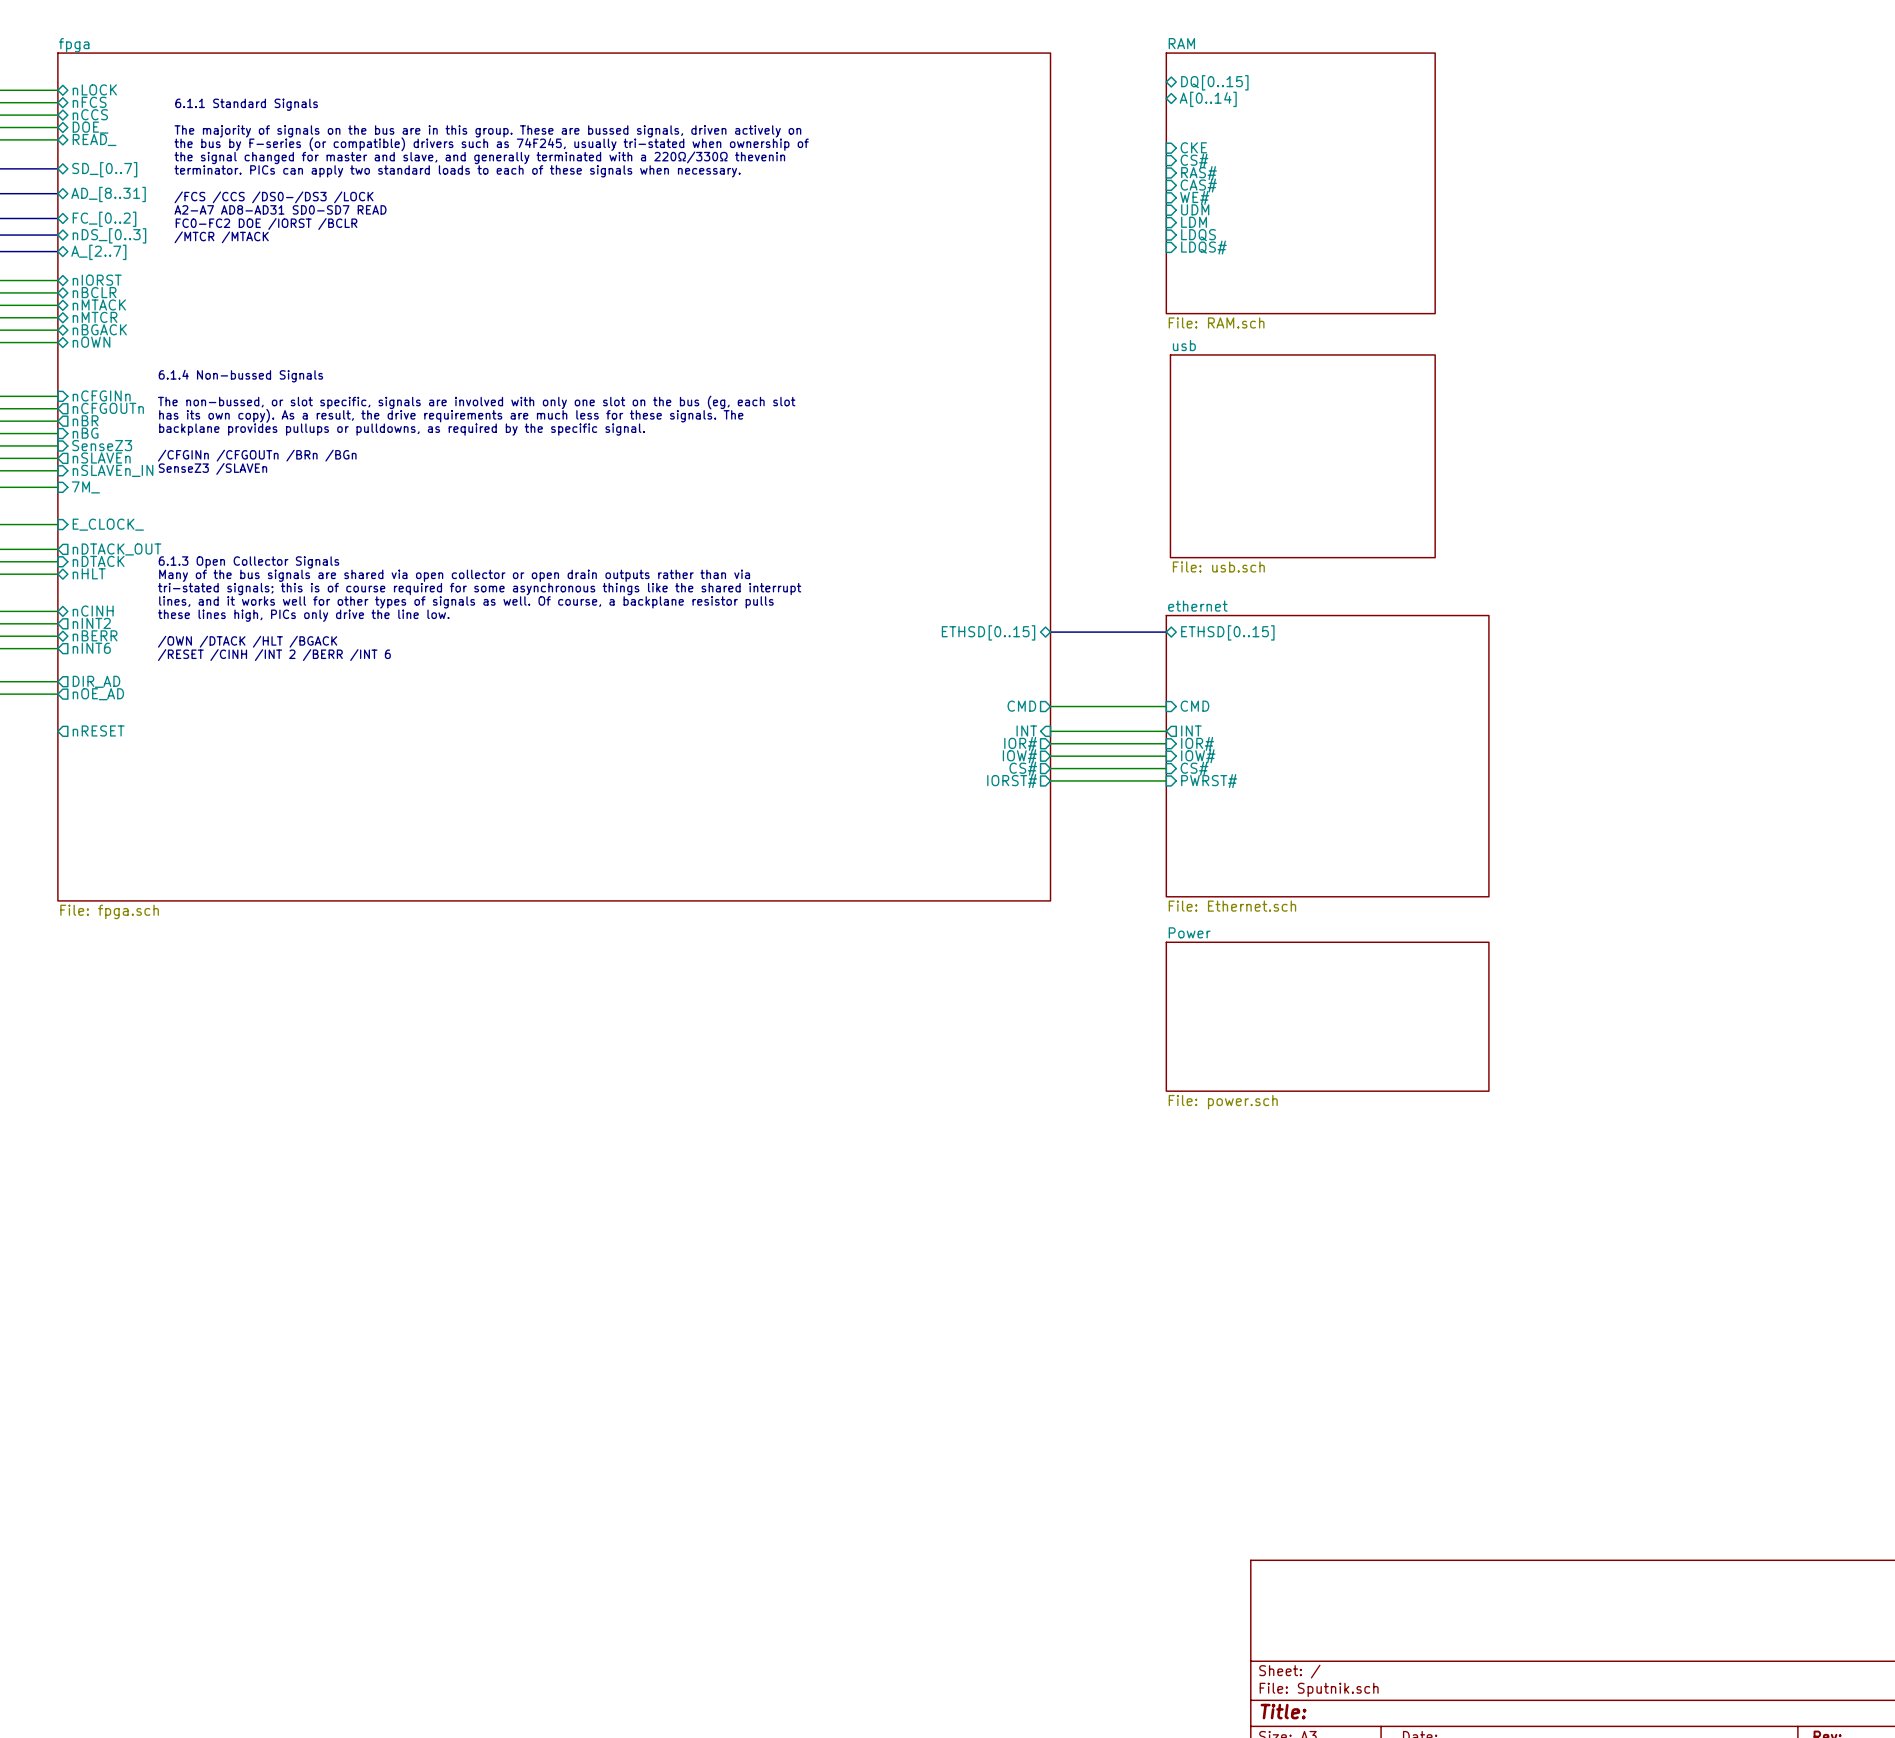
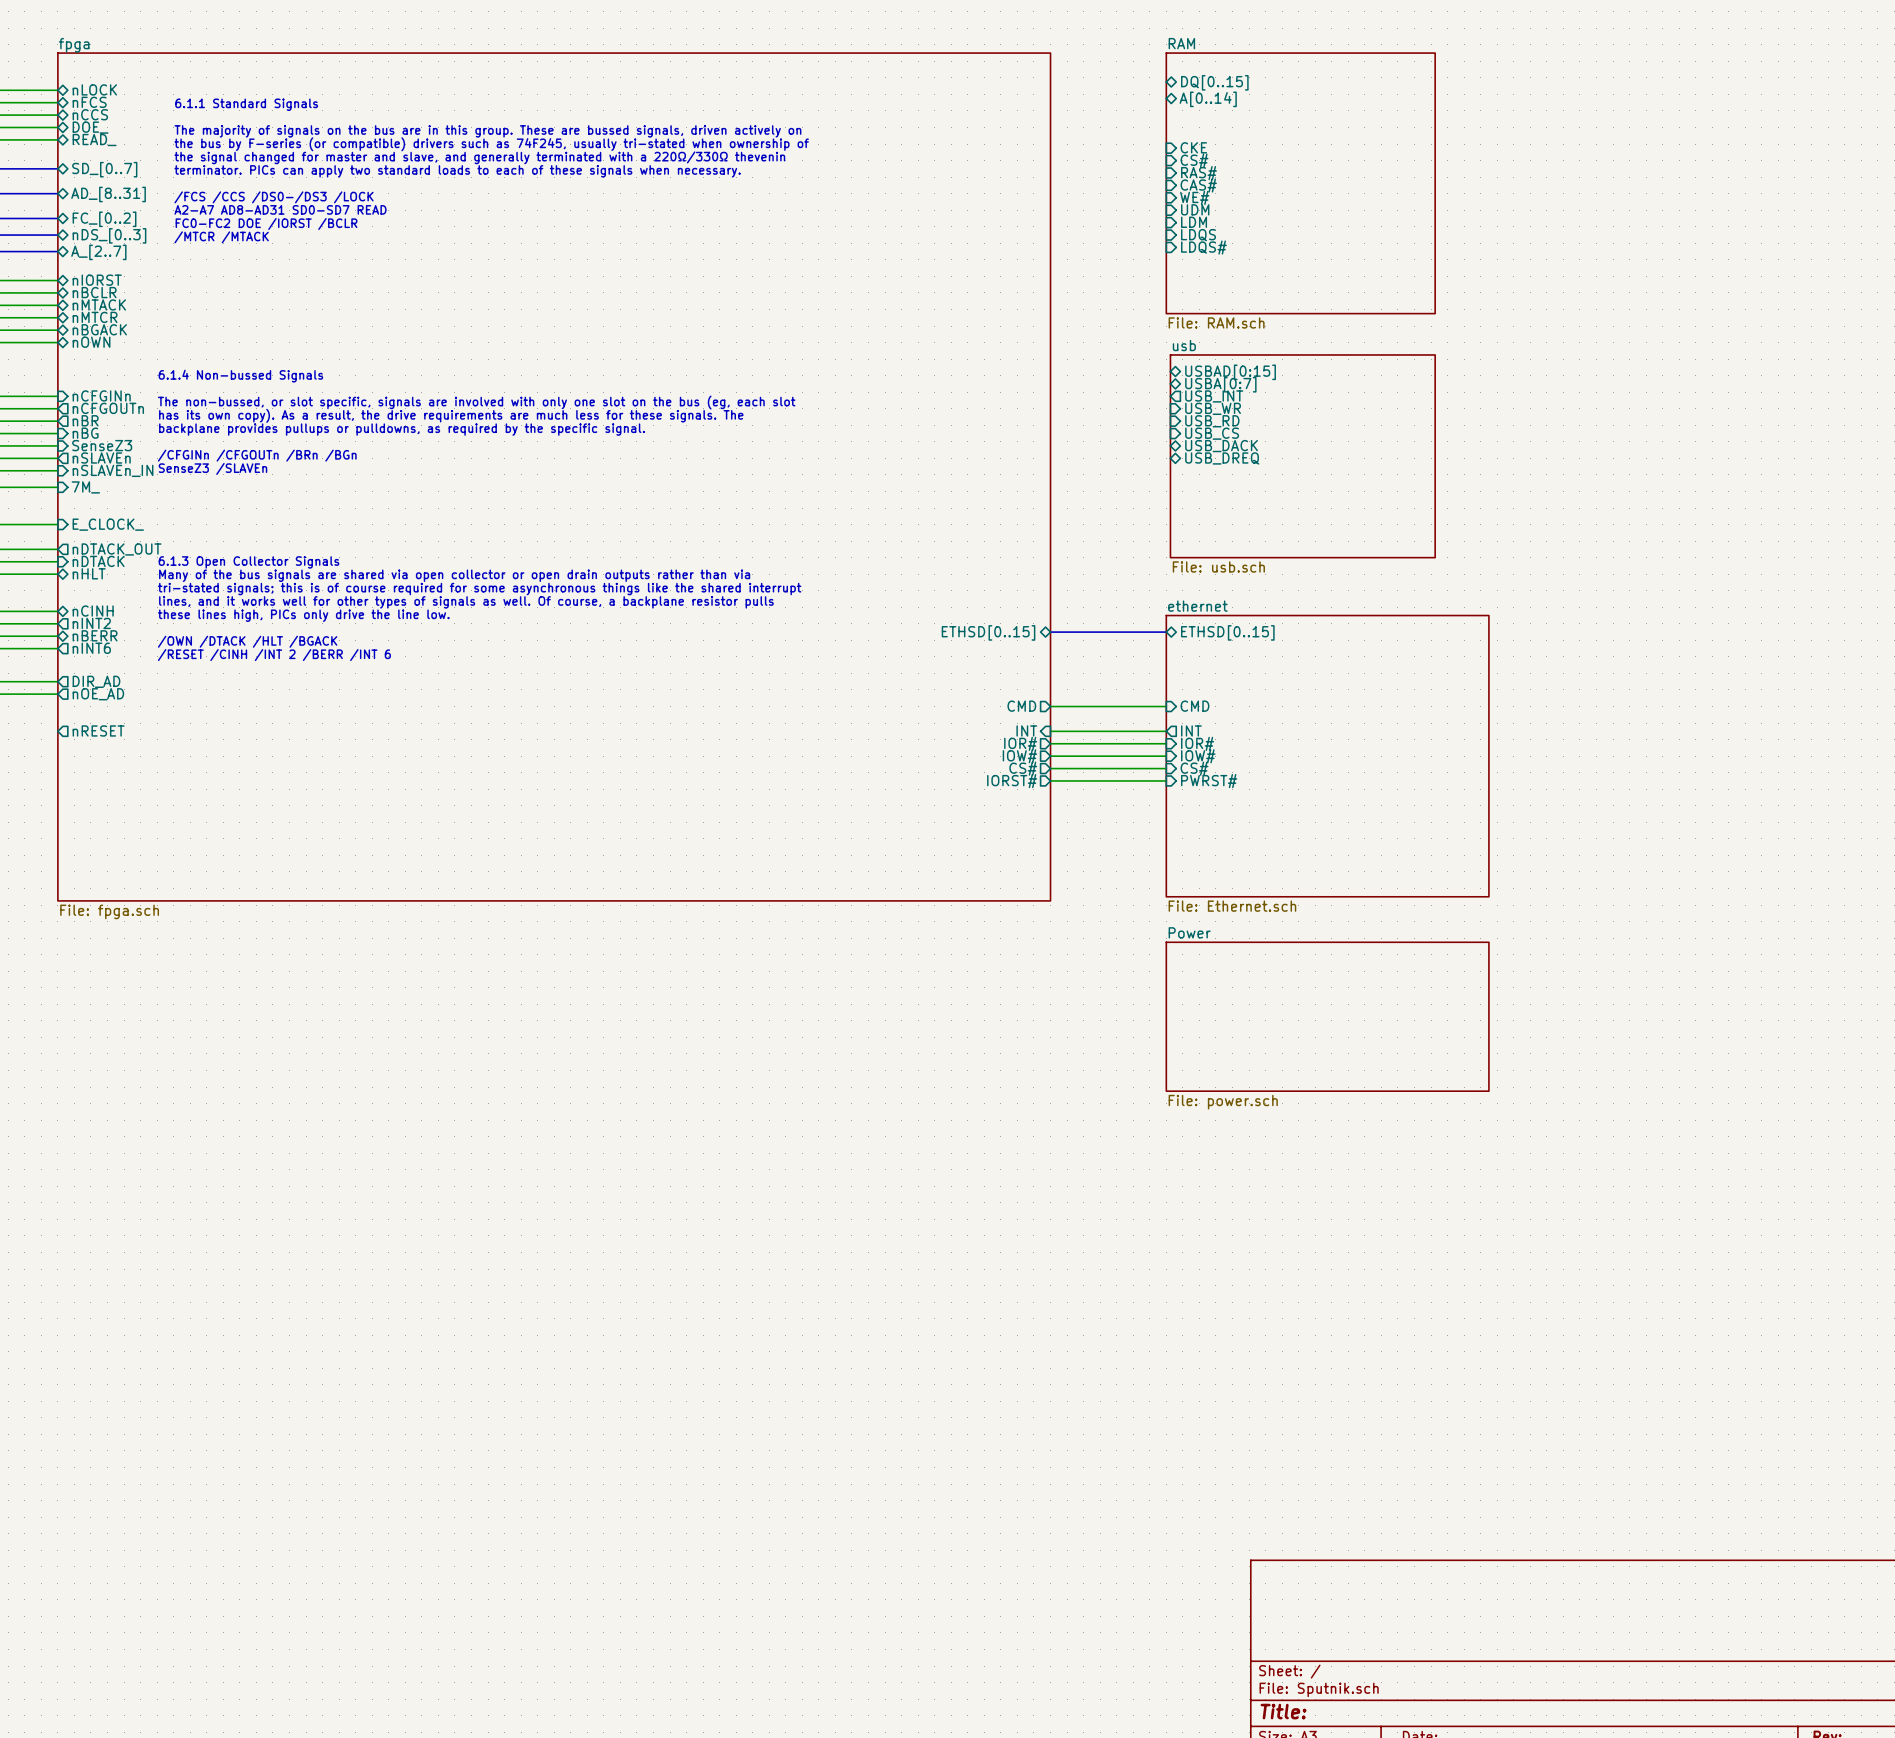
sheet pin: none -> USBAD[0:15] (1230, 372)
sheet pin: none -> USBA[0:7] (1220, 384)
sheet pin: none -> USB_INT (1214, 396)
sheet pin: none -> USB_WR (1213, 408)
sheet pin: none -> USB_RD (1212, 421)
sheet pin: none -> USB_CS (1212, 433)
sheet pin: none -> USB_DACK (1221, 446)
sheet pin: none -> USB_DREQ (1222, 458)

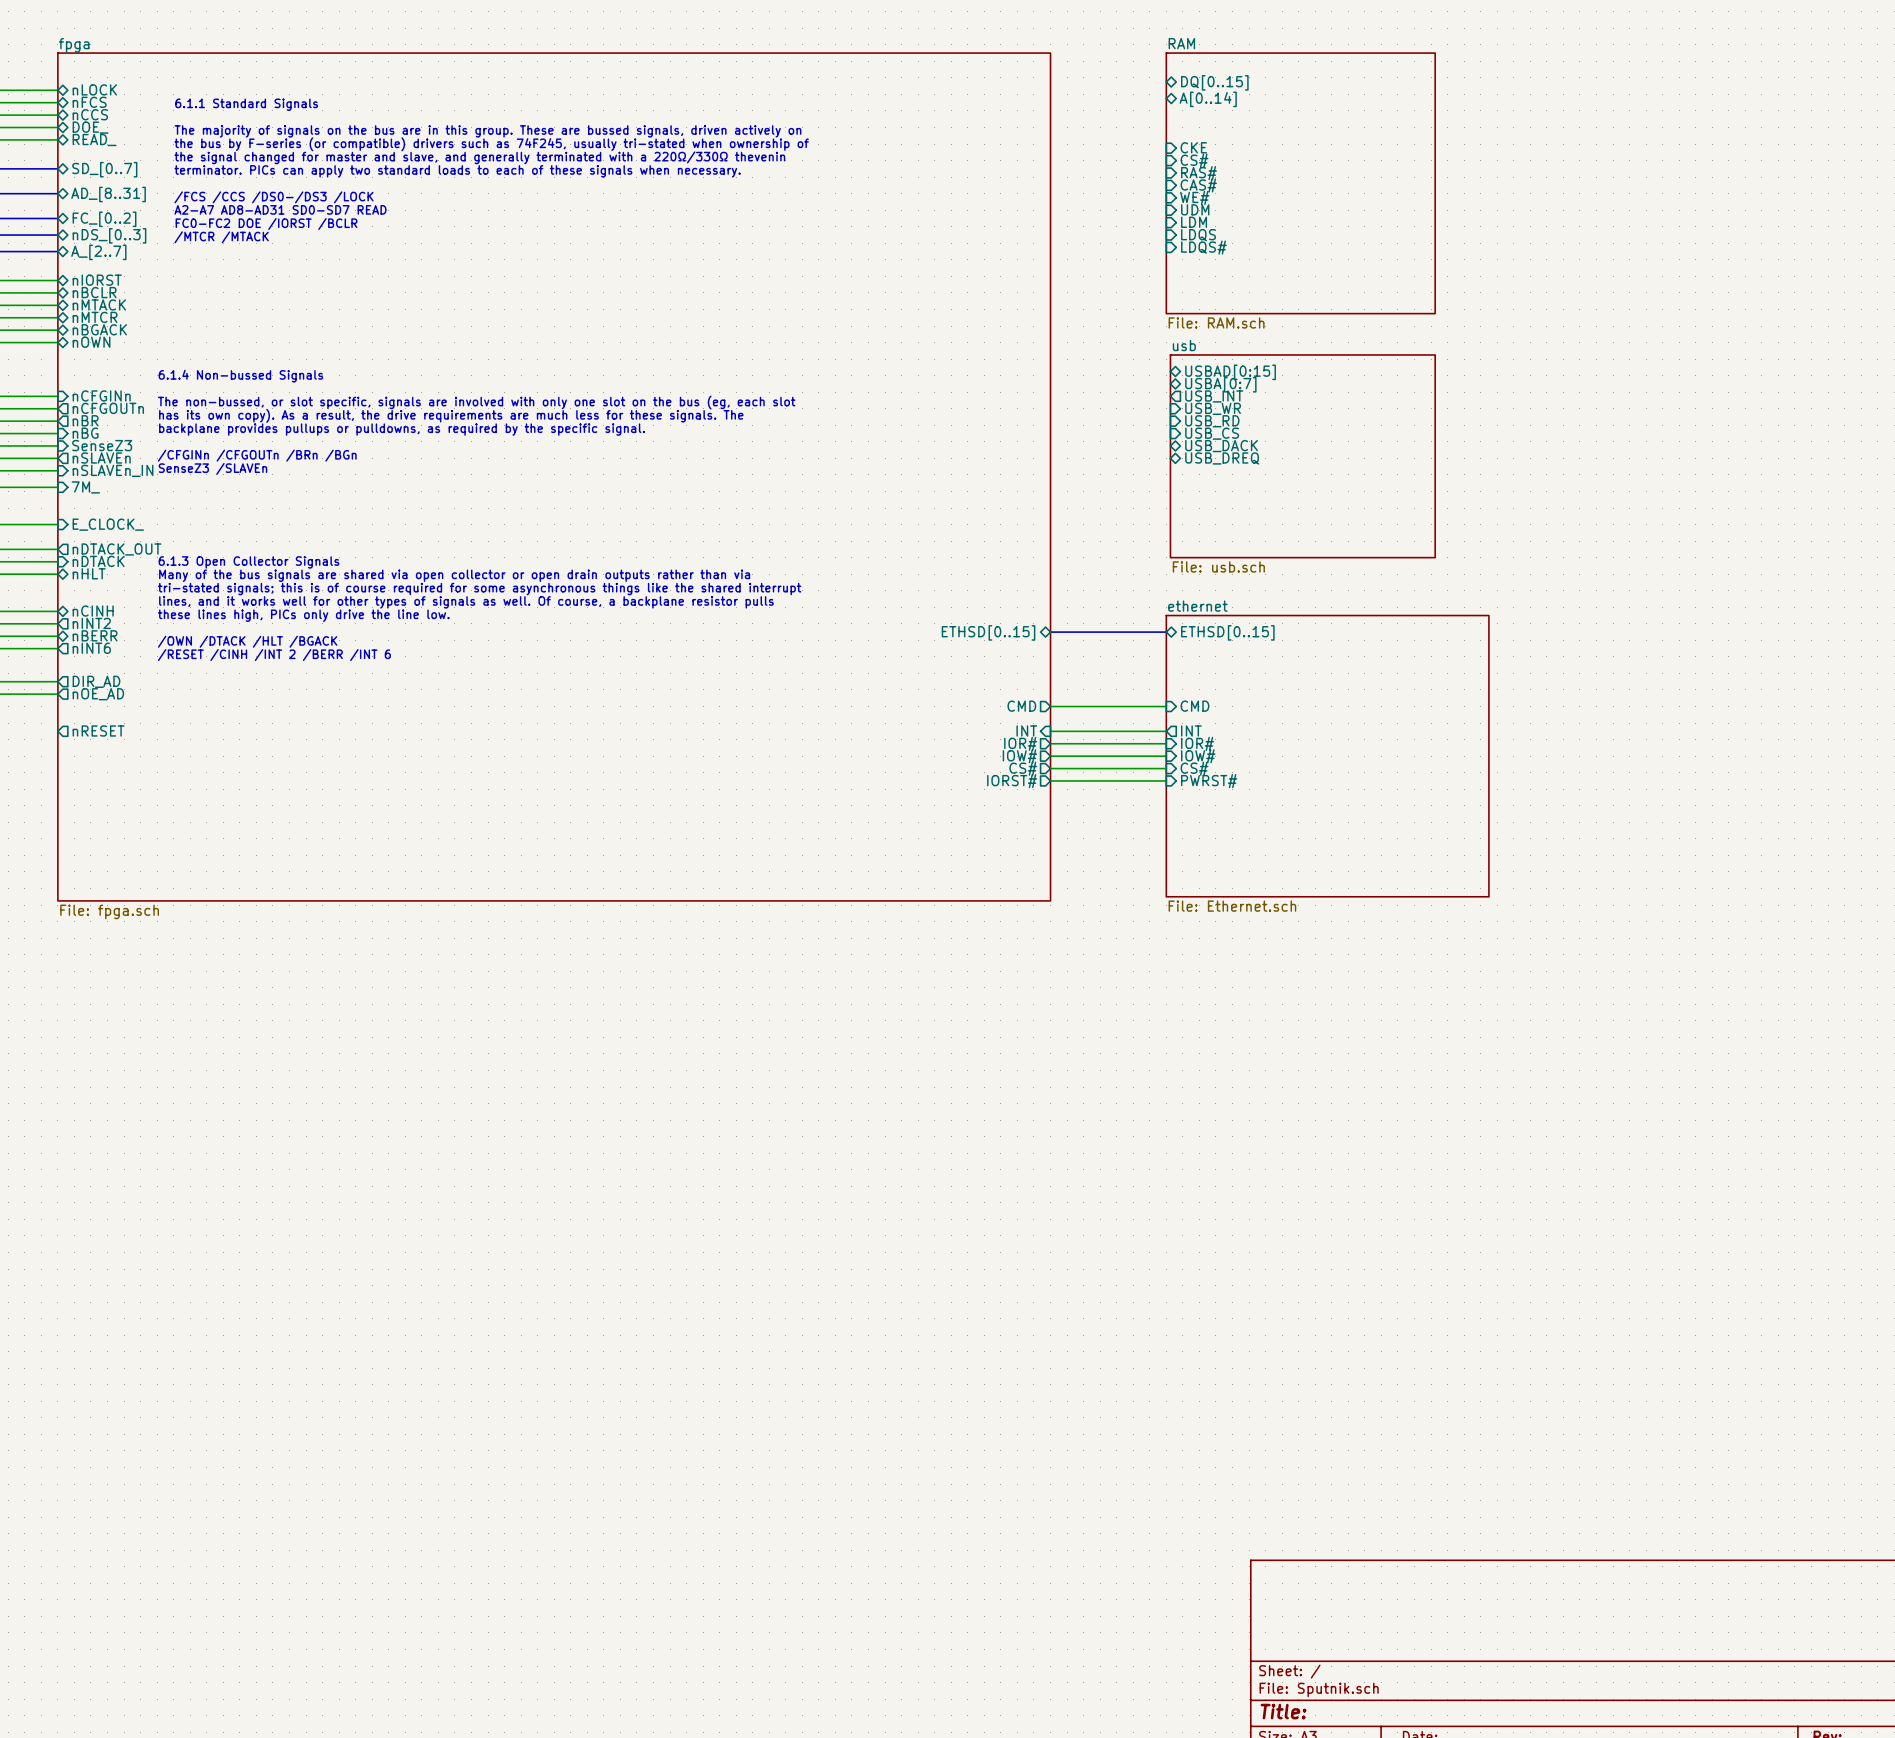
sheet Power: File: power.sch (1327, 1016) -> none

